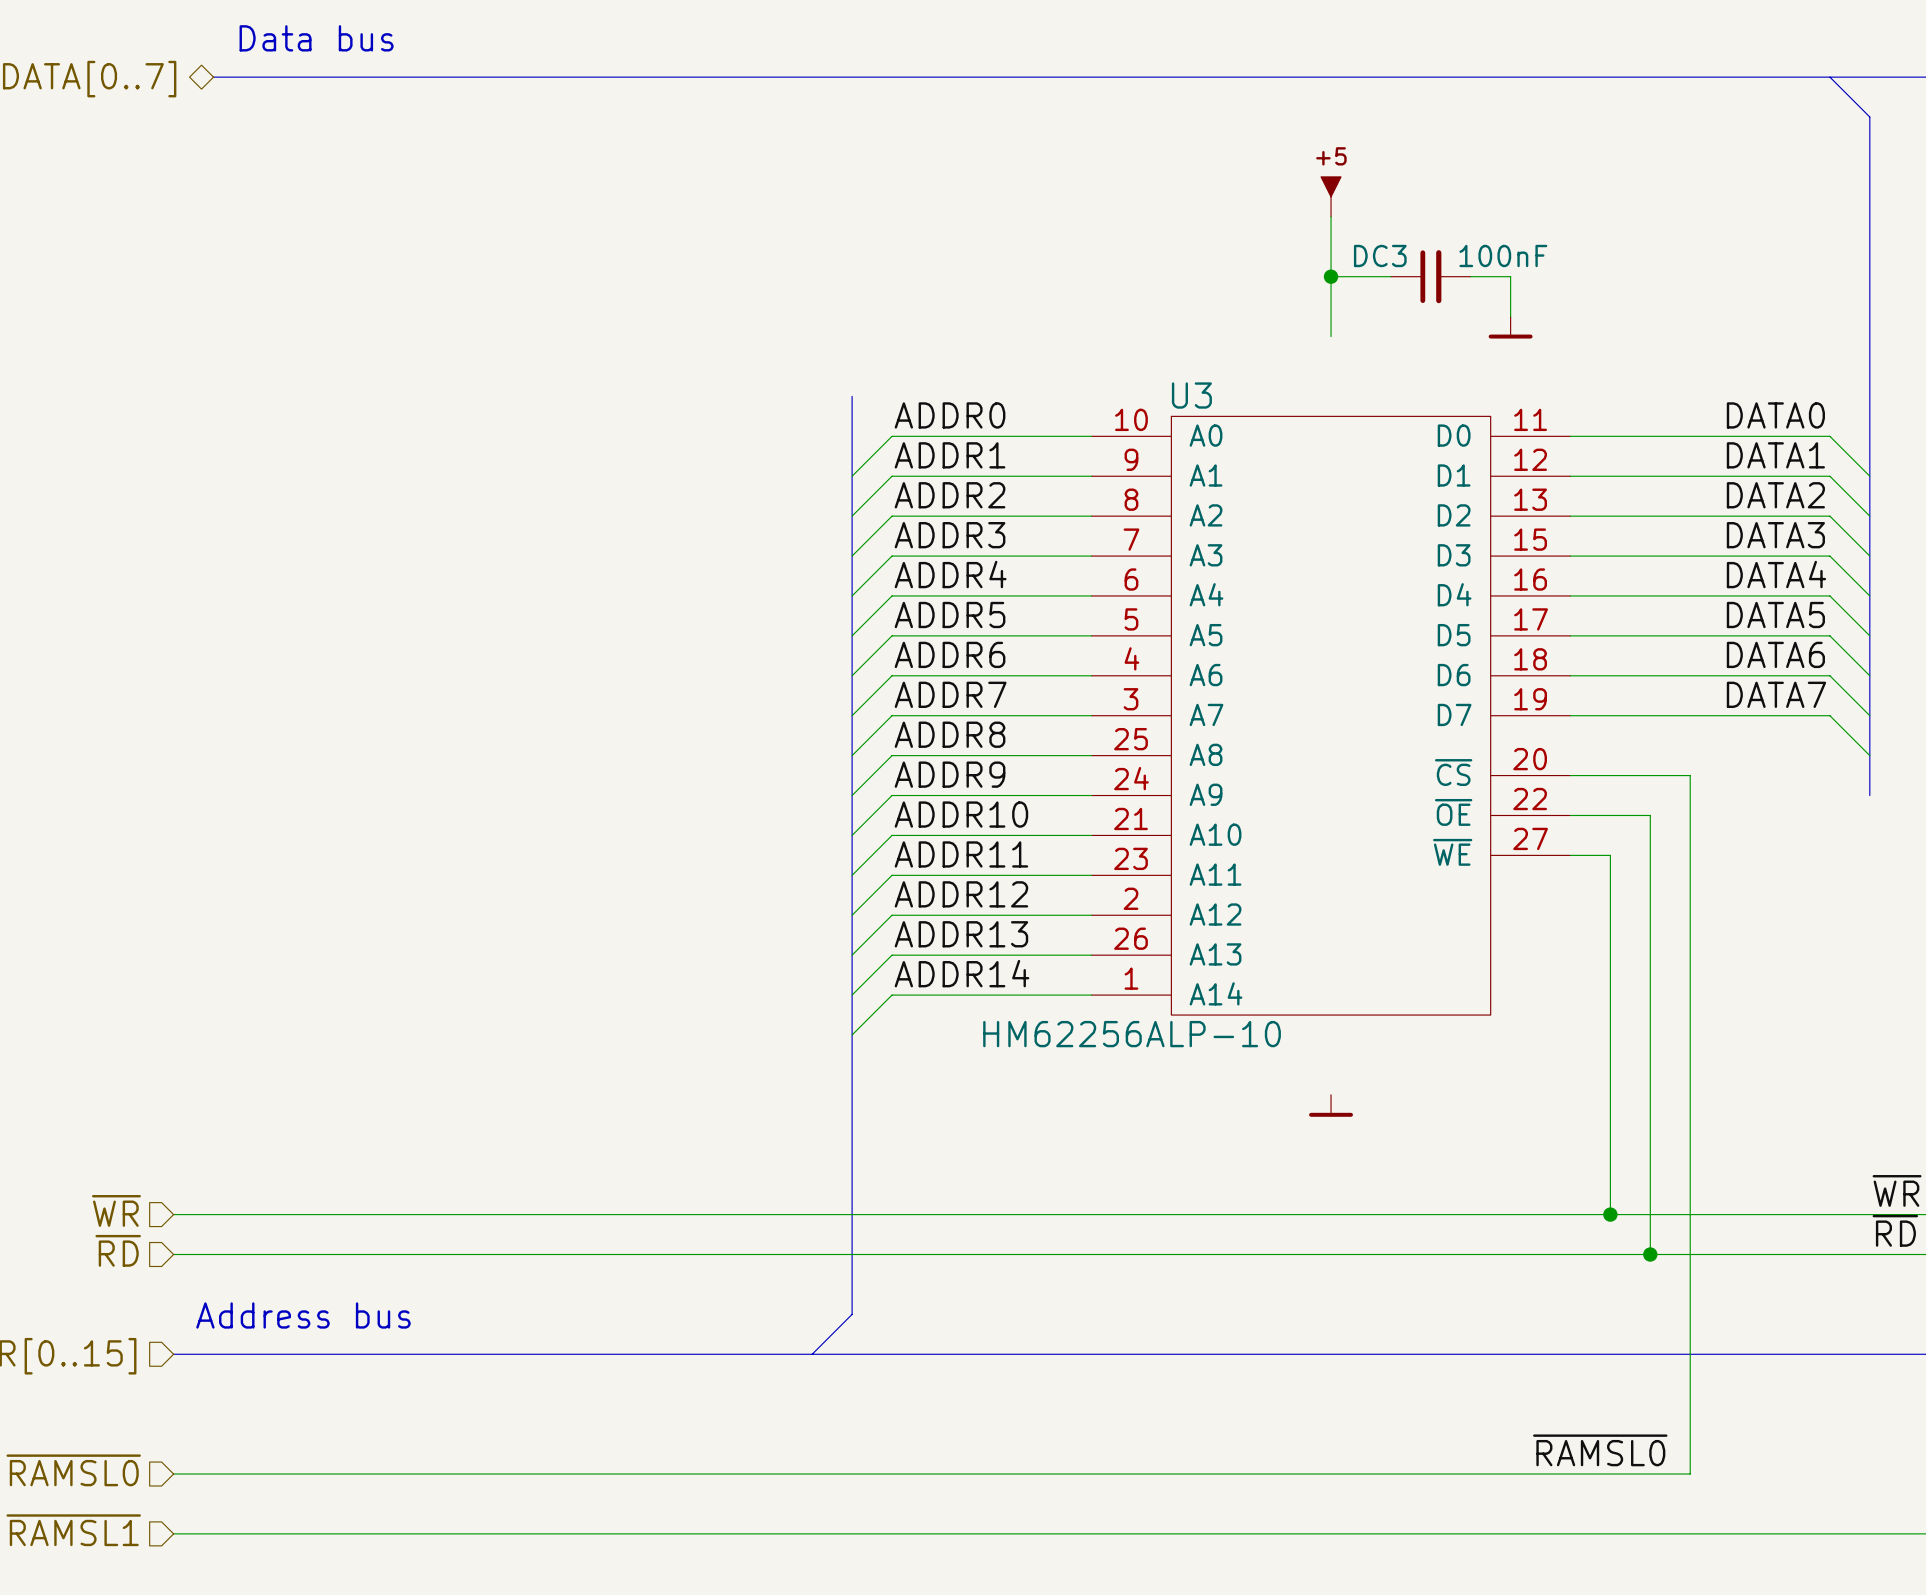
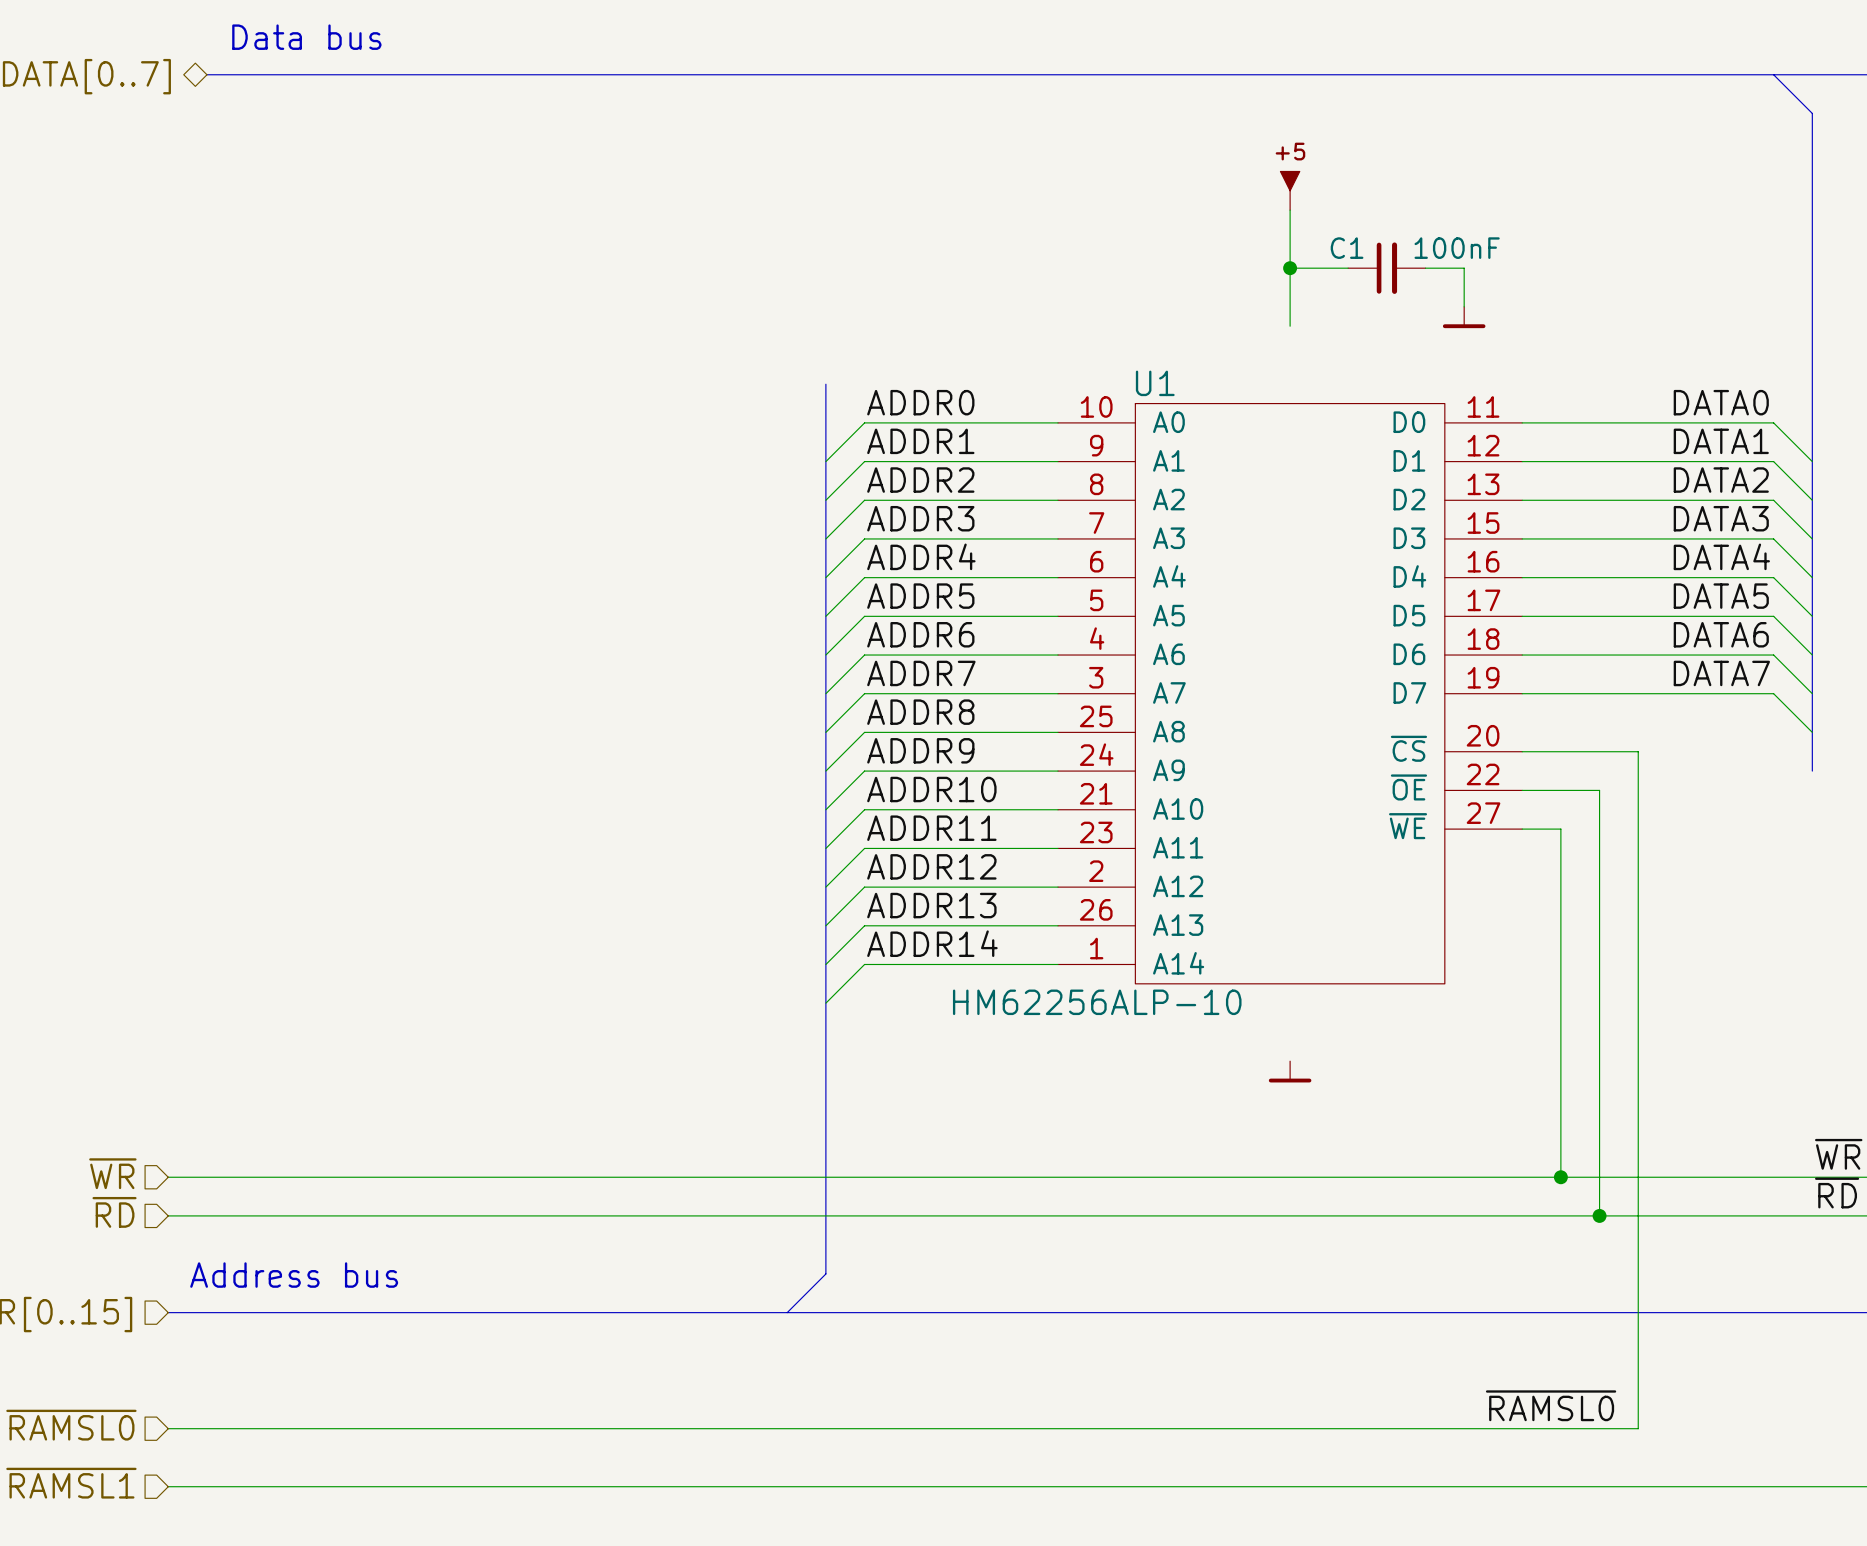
DC3 name: DC3 (1380, 255) -> C1 (1347, 248)
U3 name: U3 (1191, 395) -> U1 (1155, 383)

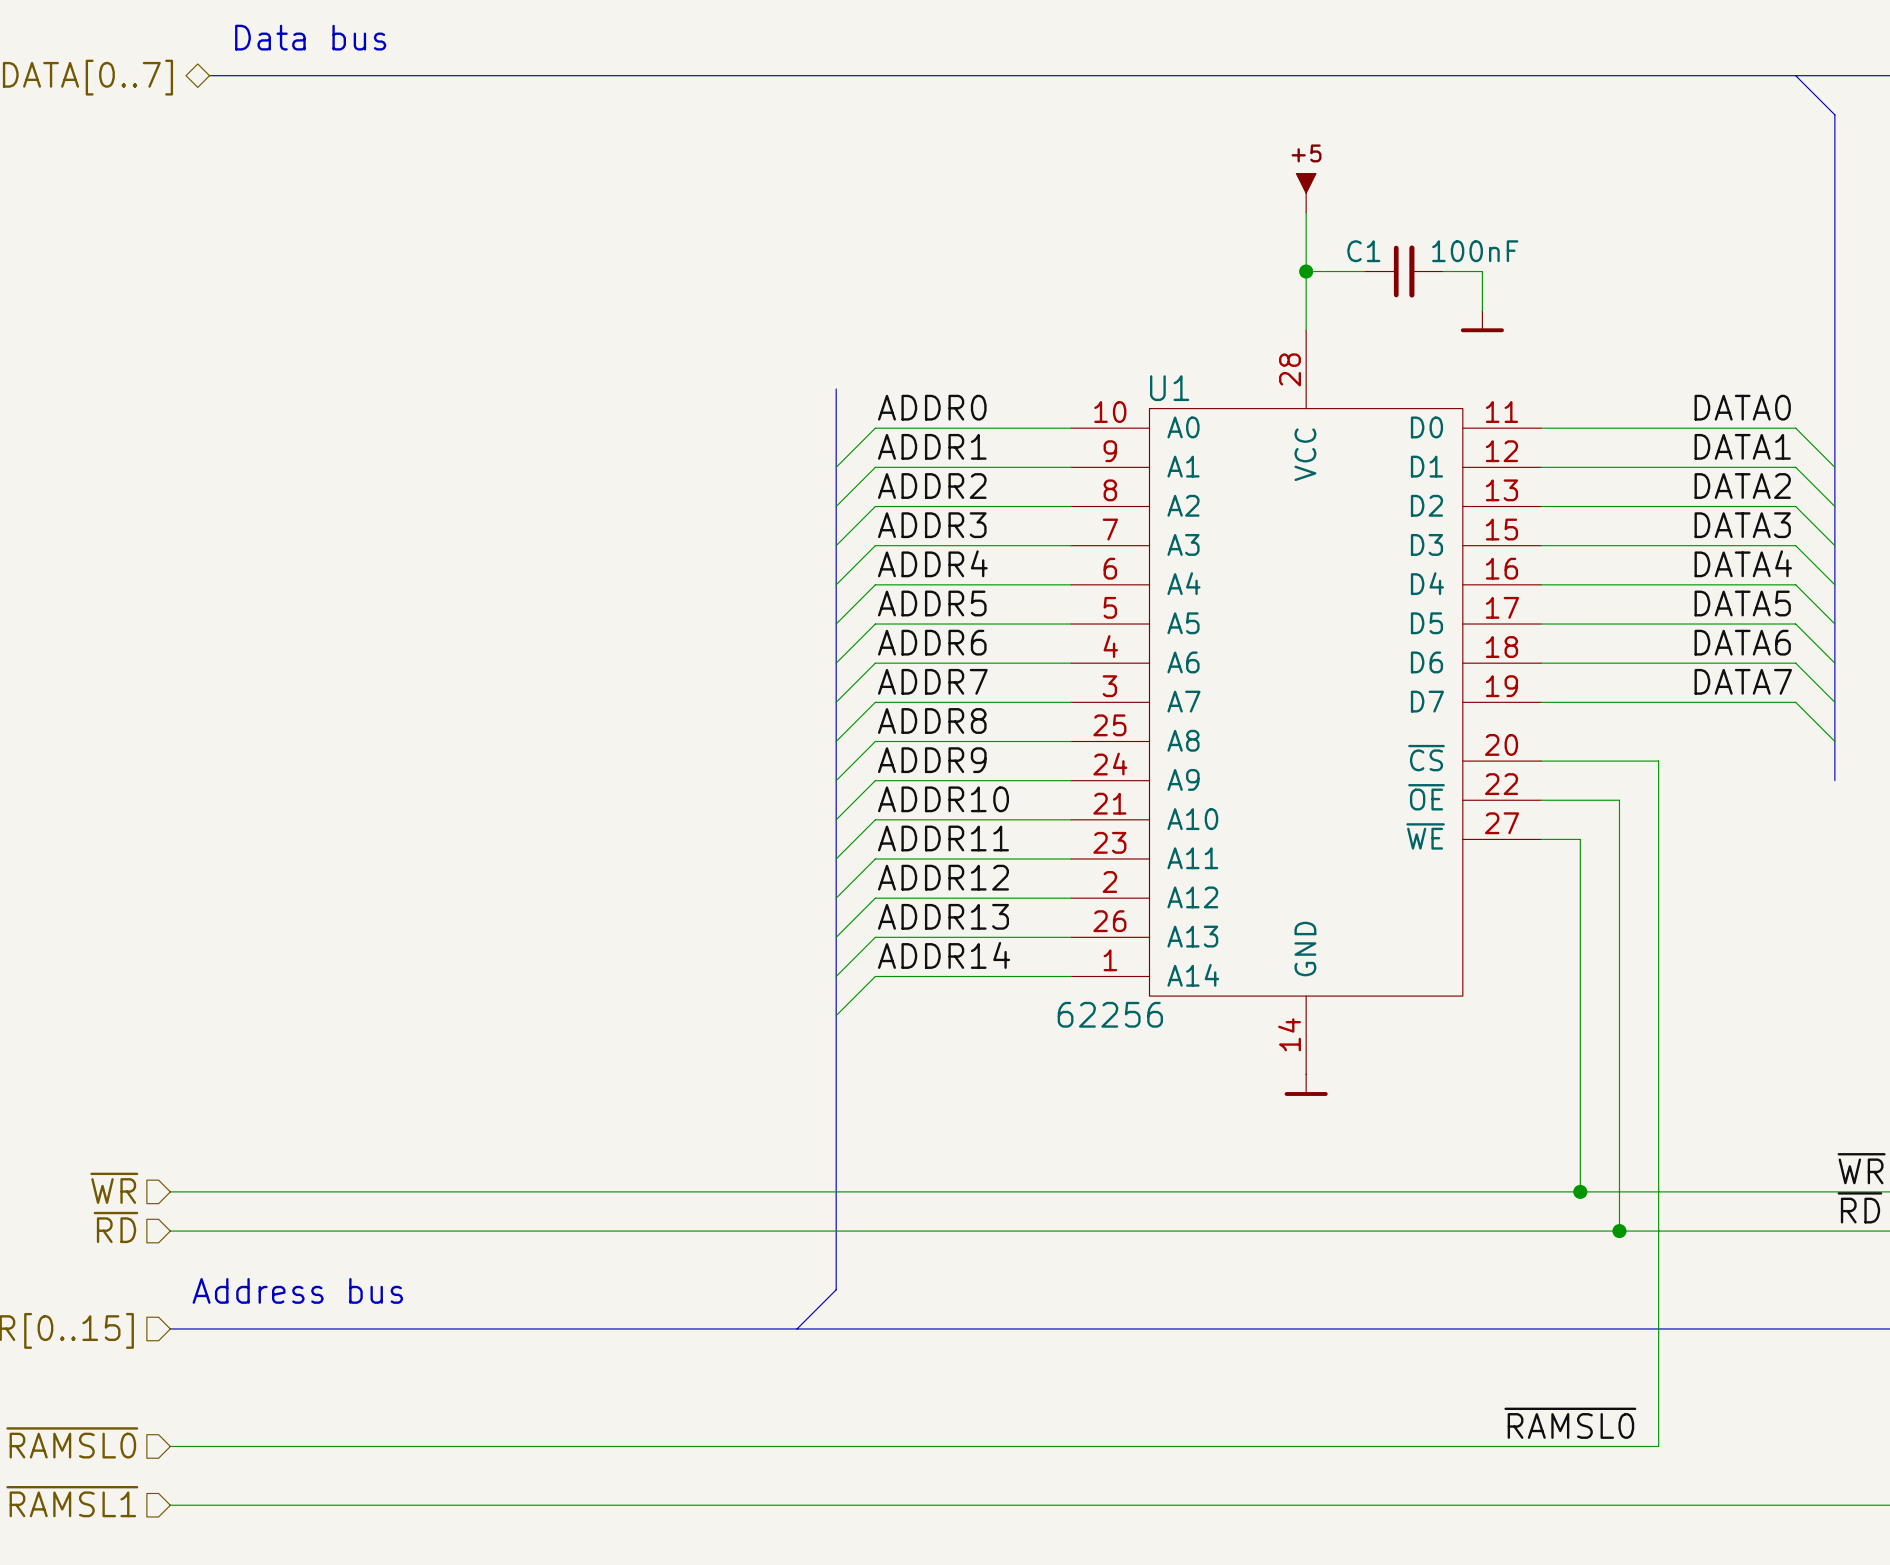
U1 symbol: [1058, 403, 1523, 984] -> [1071, 330, 1542, 1075]
U1 value: HM62256ALP-10 (1097, 1002) -> 62256 (1110, 1014)

